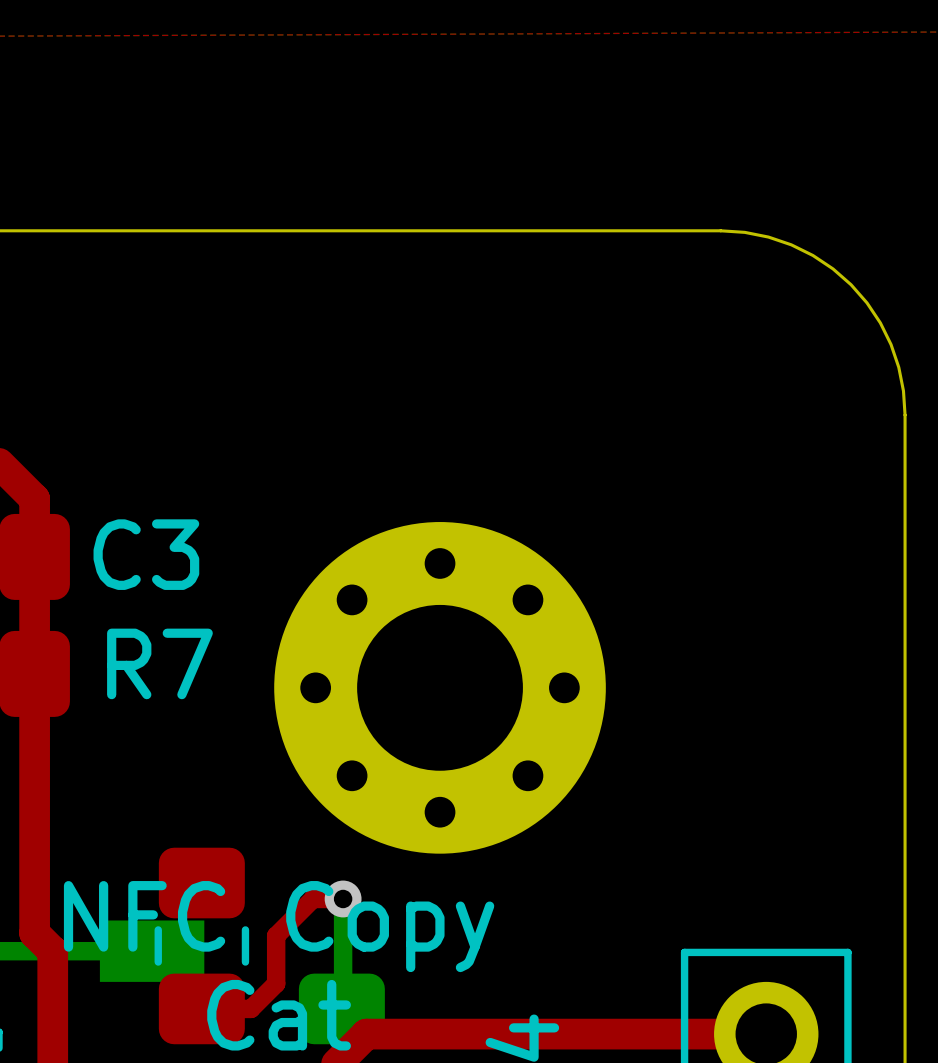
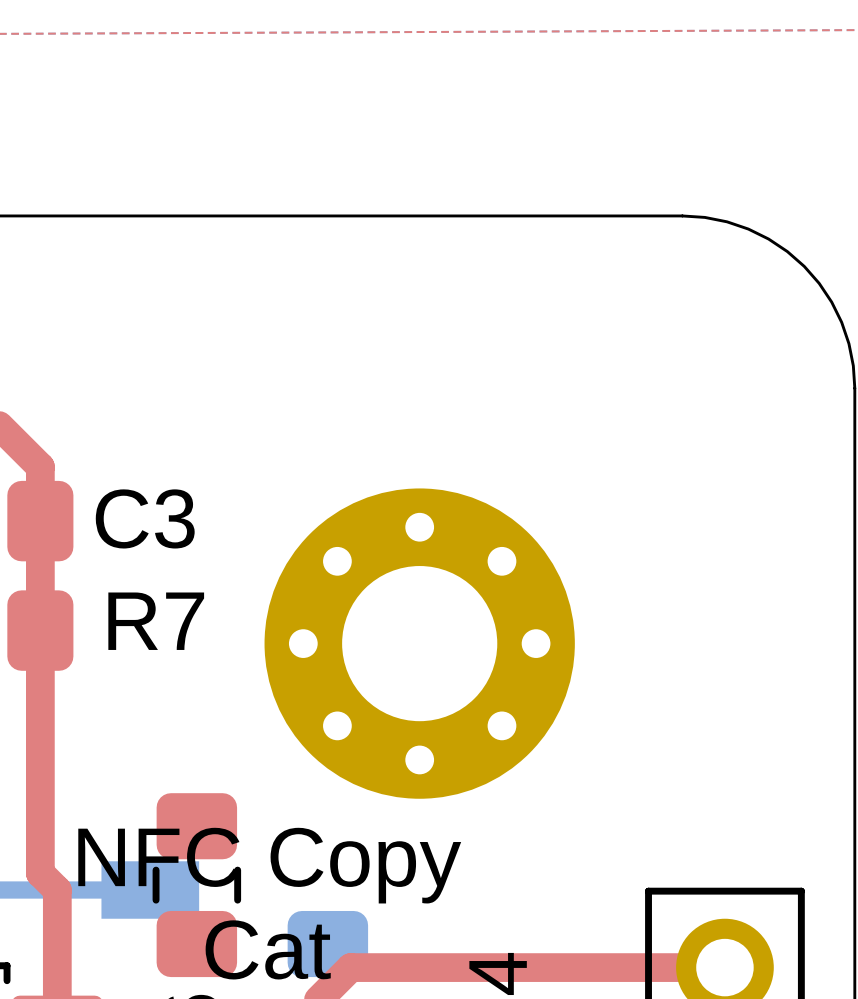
top track: (343, 898) (313, 898) (276, 935) (276, 983) (250, 1008) (201, 1008) -> none
bottom track: (343, 898) (341, 1008) -> none
via: (343, 898) -> none

